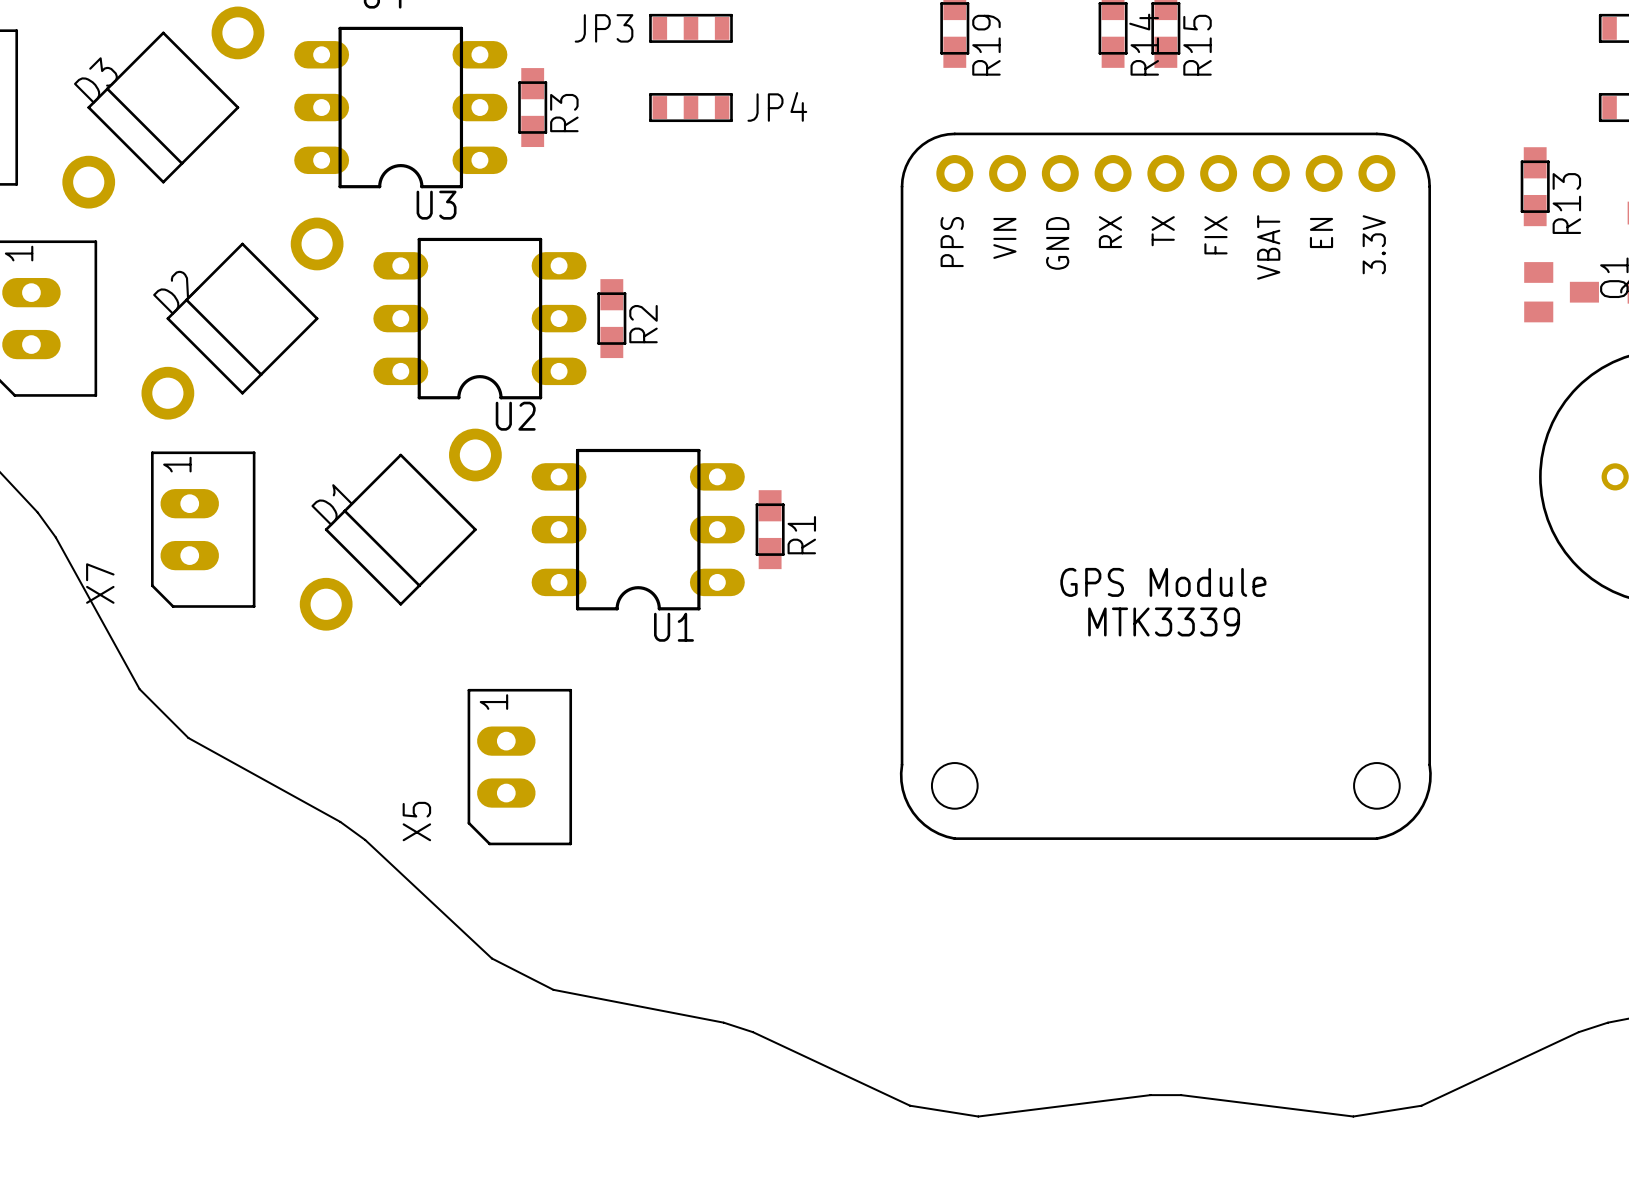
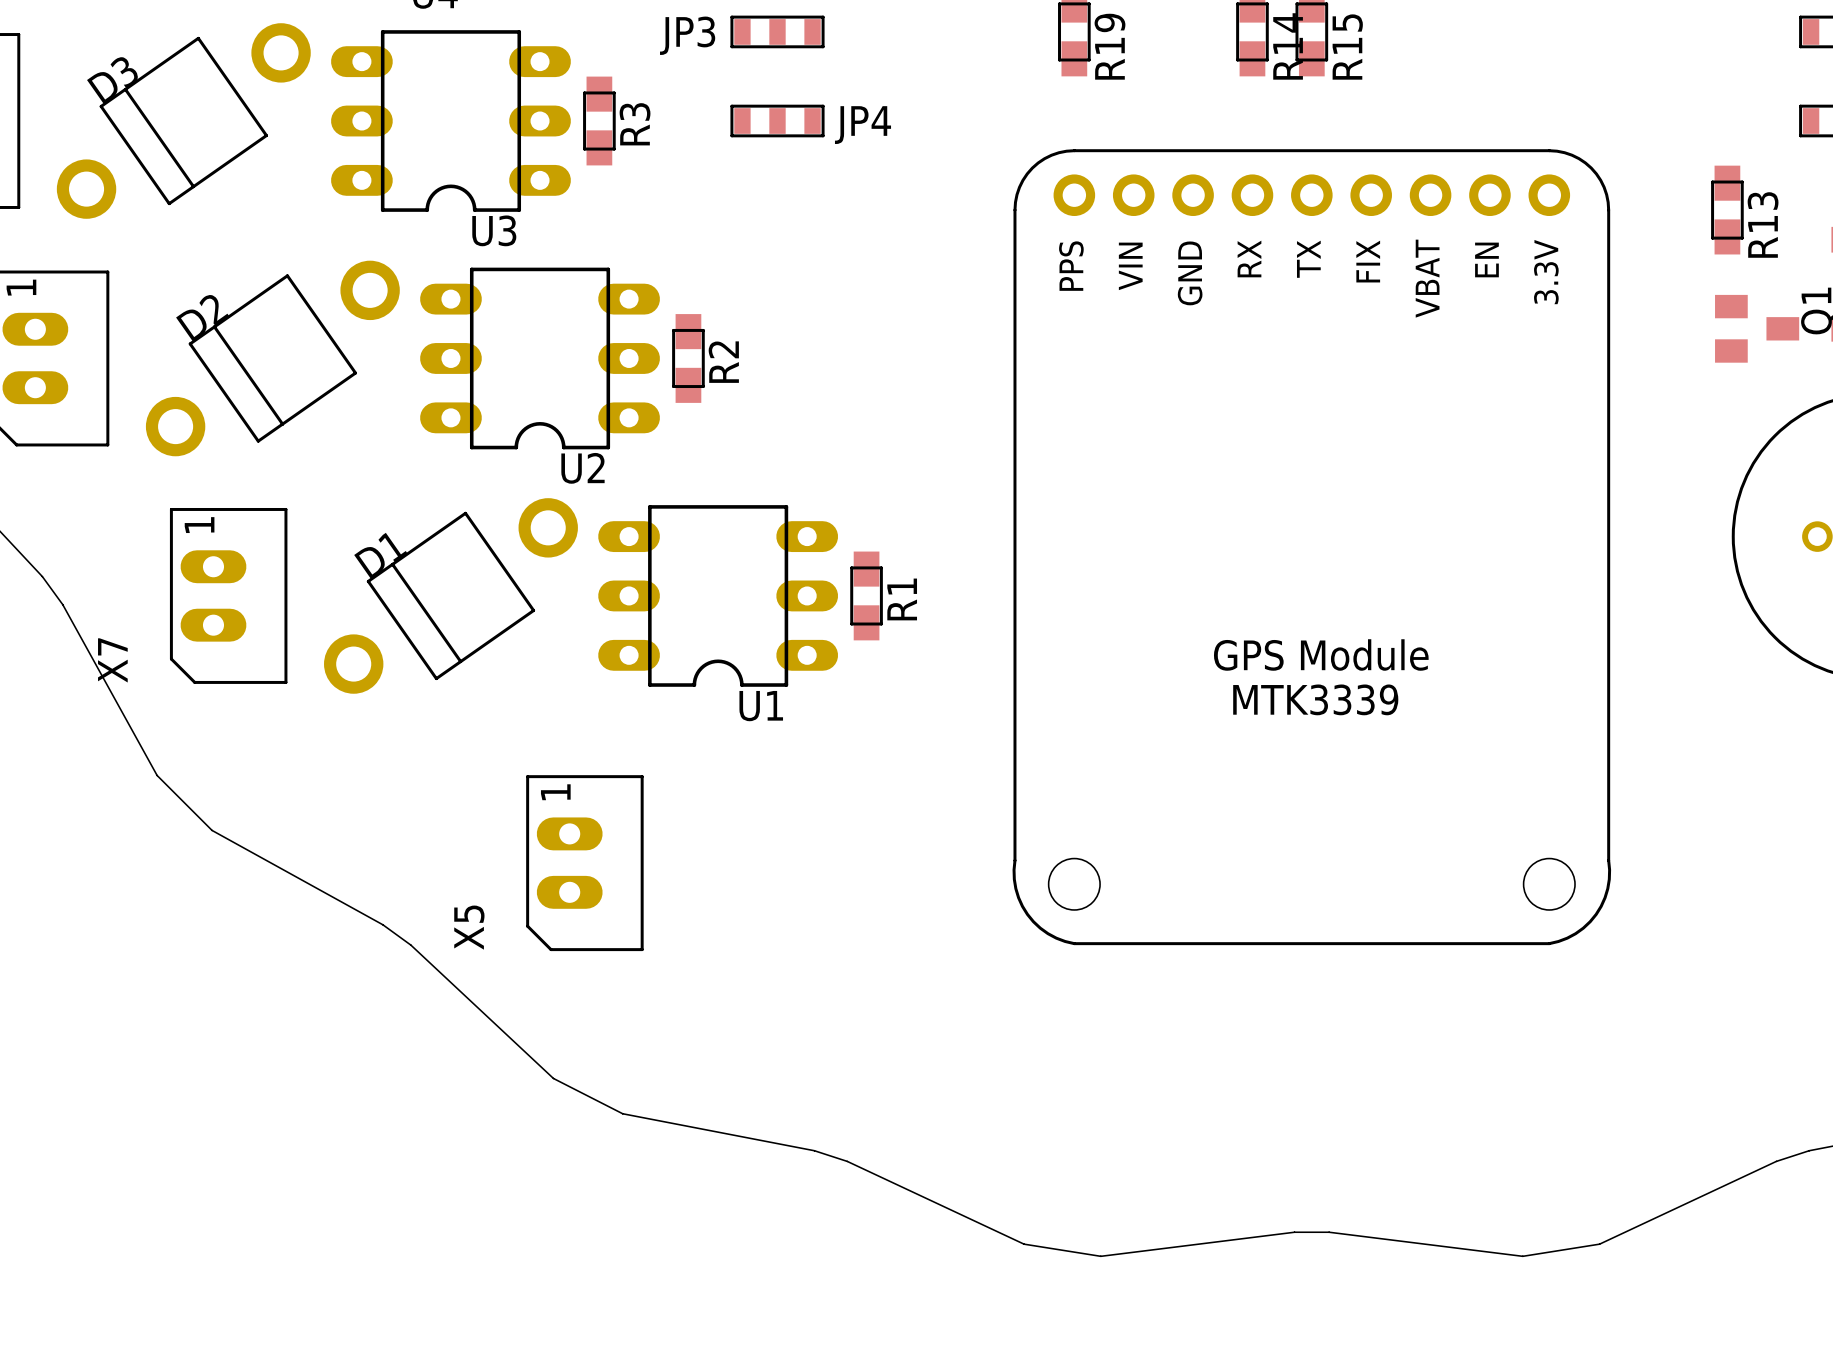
D3 rotation: 0° (163, 107) -> 10° clockwise (183, 121)
D2 rotation: 0° (242, 318) -> 10° clockwise (272, 358)
D1 rotation: 0° (400, 529) -> 10° clockwise (450, 595)

